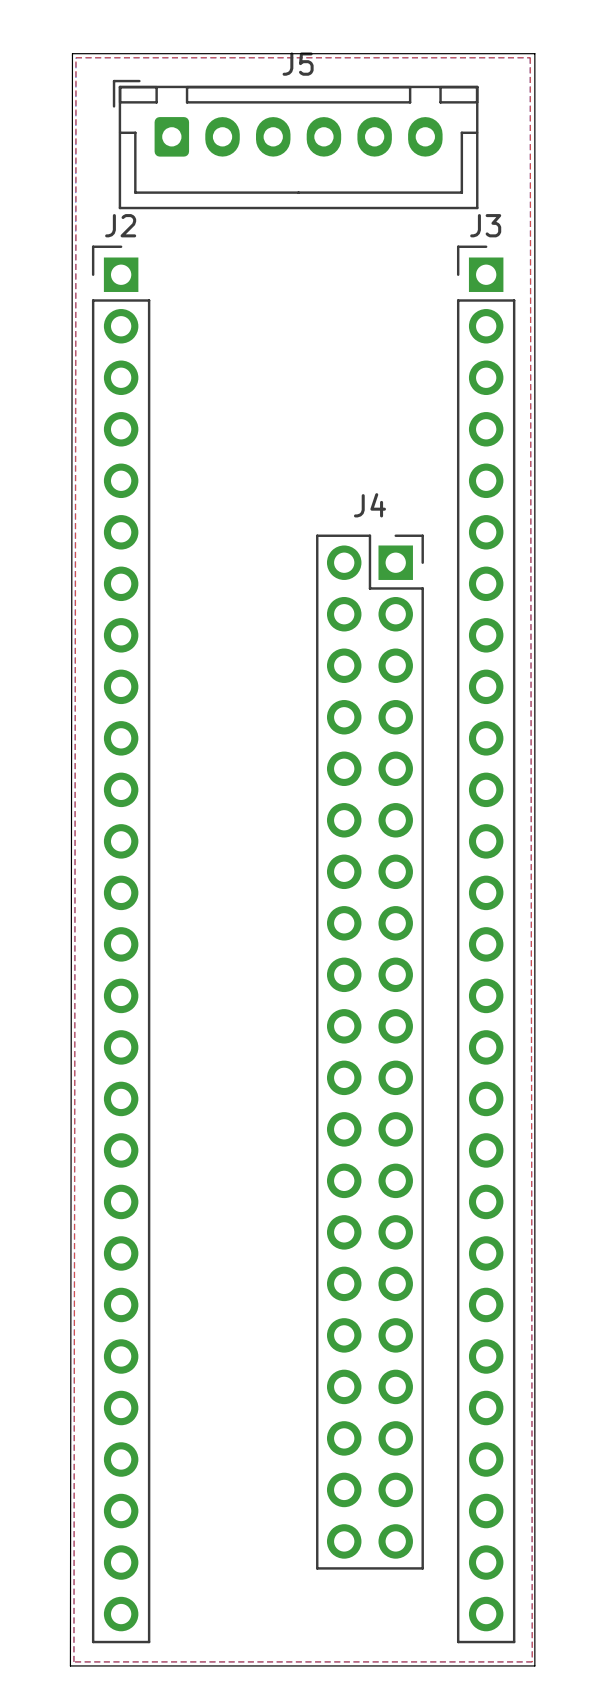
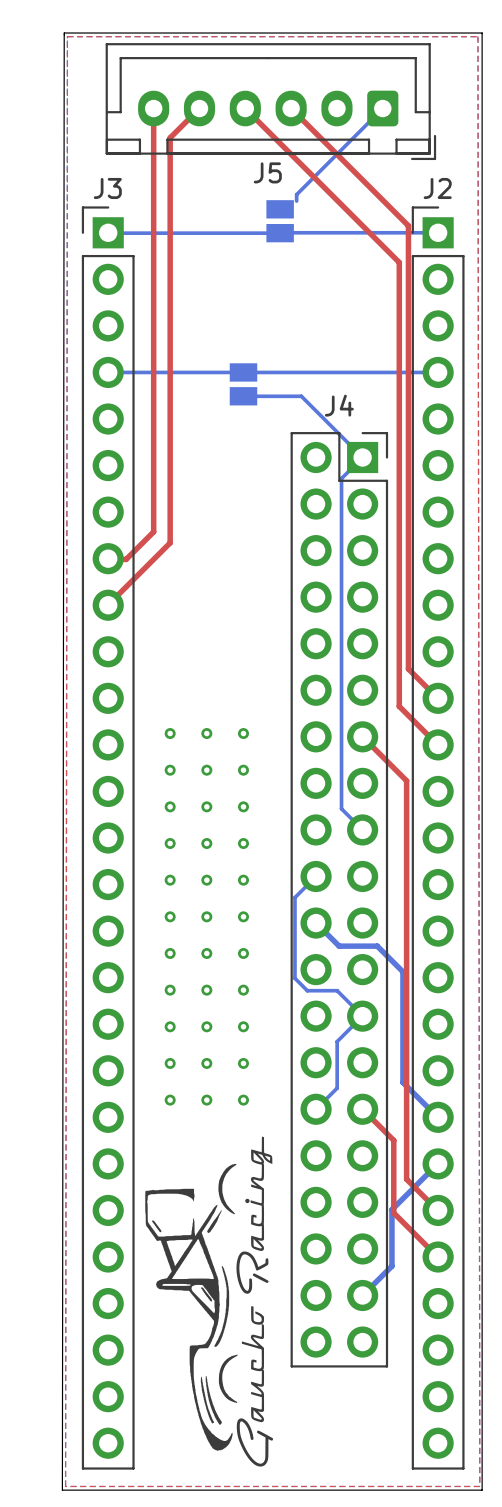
top track: none -> (153, 108) (153, 531) (126, 559) (107, 559)
top track: none -> (199, 108) (170, 137) (170, 542) (107, 605)
top track: none -> (245, 108) (399, 262) (399, 706) (437, 744)
top track: none -> (291, 108) (408, 225) (408, 669) (437, 698)
bottom track: none -> (382, 108) (296, 194) (296, 201)
J5 rotation: 0° (295, 144) -> 180° (270, 101)
J2 name: J2 (120, 225) -> J3 (107, 188)
J3 name: J3 (485, 225) -> J2 (437, 188)
part: none -> (280, 221)
bottom track: none -> (437, 232) (107, 233)
bottom track: none -> (437, 372) (107, 373)
part: none -> (243, 384)
bottom track: none -> (243, 396) (301, 396) (362, 457) (341, 478) (341, 808) (362, 829)
via: none -> (170, 733)
via: none -> (206, 733)
via: none -> (243, 733)
top track: none -> (362, 736) (406, 780) (406, 1179) (437, 1210)
via: none -> (170, 770)
via: none -> (206, 770)
via: none -> (243, 770)
via: none -> (170, 806)
via: none -> (206, 806)
via: none -> (243, 806)
via: none -> (170, 843)
via: none -> (206, 843)
via: none -> (243, 843)
bottom track: none -> (316, 876) (294, 897) (294, 978) (307, 990) (337, 990) (362, 1016) (337, 1041) (337, 1088) (316, 1109)
via: none -> (170, 880)
via: none -> (206, 880)
via: none -> (243, 880)
via: none -> (170, 916)
via: none -> (206, 916)
via: none -> (243, 916)
bottom track: none -> (316, 923) (339, 946) (377, 946) (402, 971) (402, 1082) (437, 1117)
J4 position: (369, 1052) -> (339, 899)
via: none -> (170, 953)
via: none -> (206, 953)
via: none -> (243, 953)
via: none -> (170, 990)
via: none -> (206, 990)
via: none -> (243, 990)
via: none -> (170, 1026)
via: none -> (206, 1026)
via: none -> (243, 1026)
via: none -> (170, 1063)
via: none -> (206, 1063)
via: none -> (243, 1063)
via: none -> (170, 1100)
via: none -> (206, 1100)
via: none -> (243, 1100)
top track: none -> (362, 1109) (393, 1140) (393, 1213) (437, 1257)
drawing: none -> [145, 1136, 274, 1467]
bottom track: none -> (437, 1163) (391, 1209) (391, 1266) (362, 1295)

